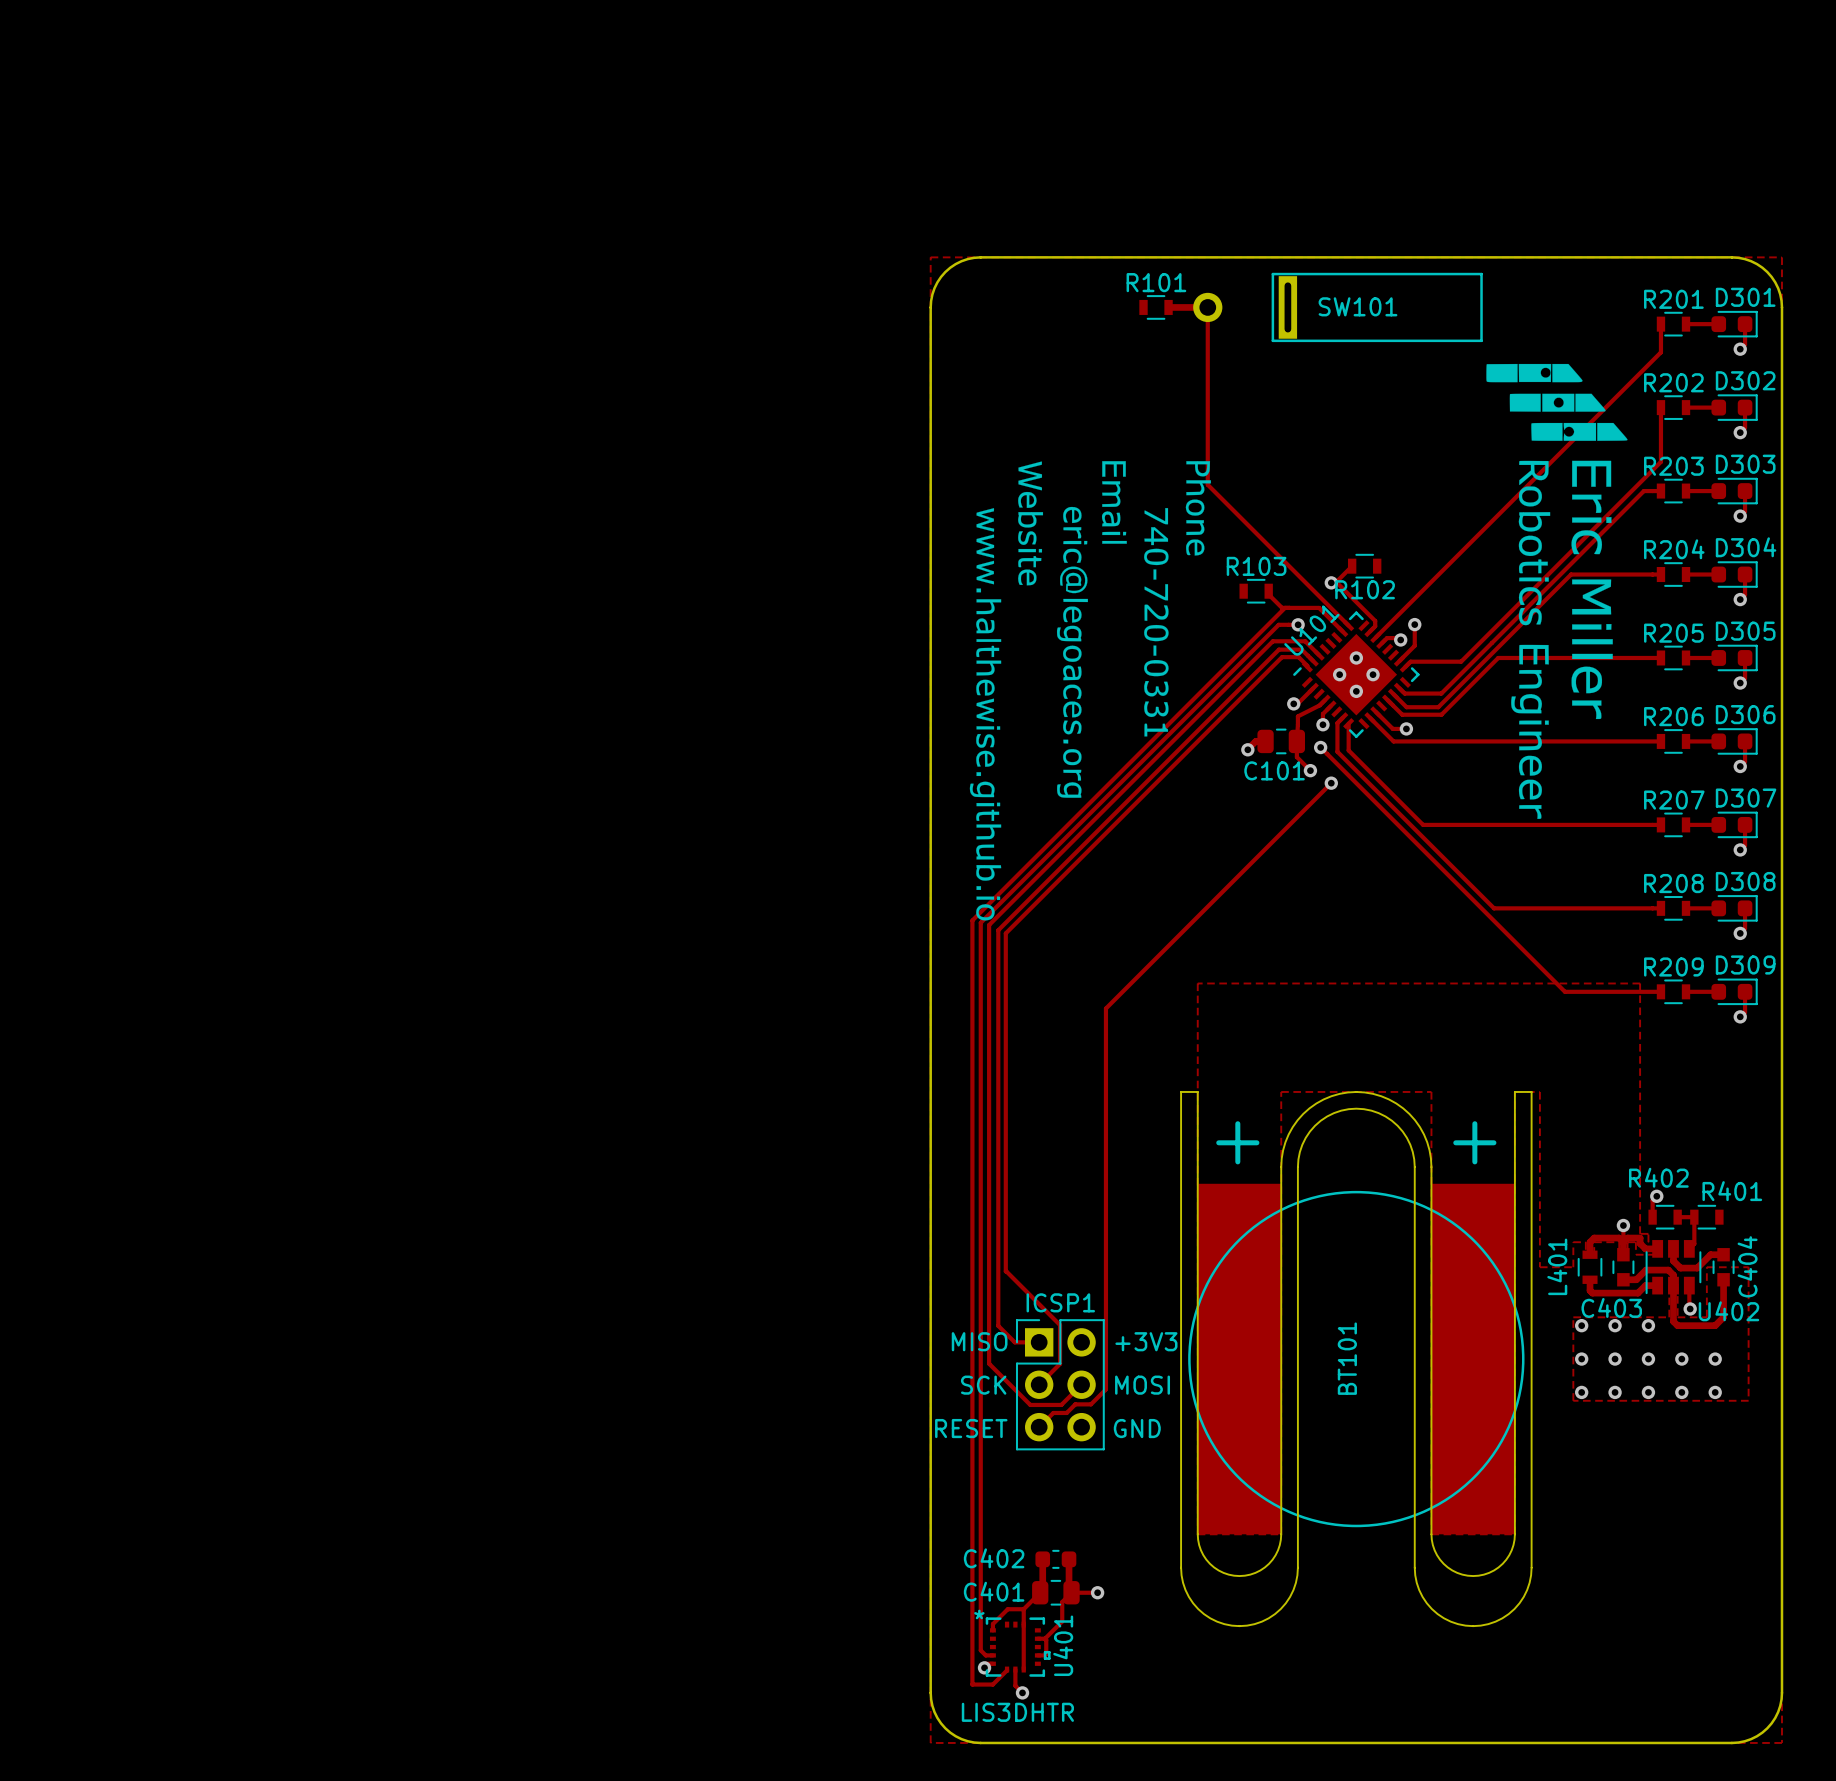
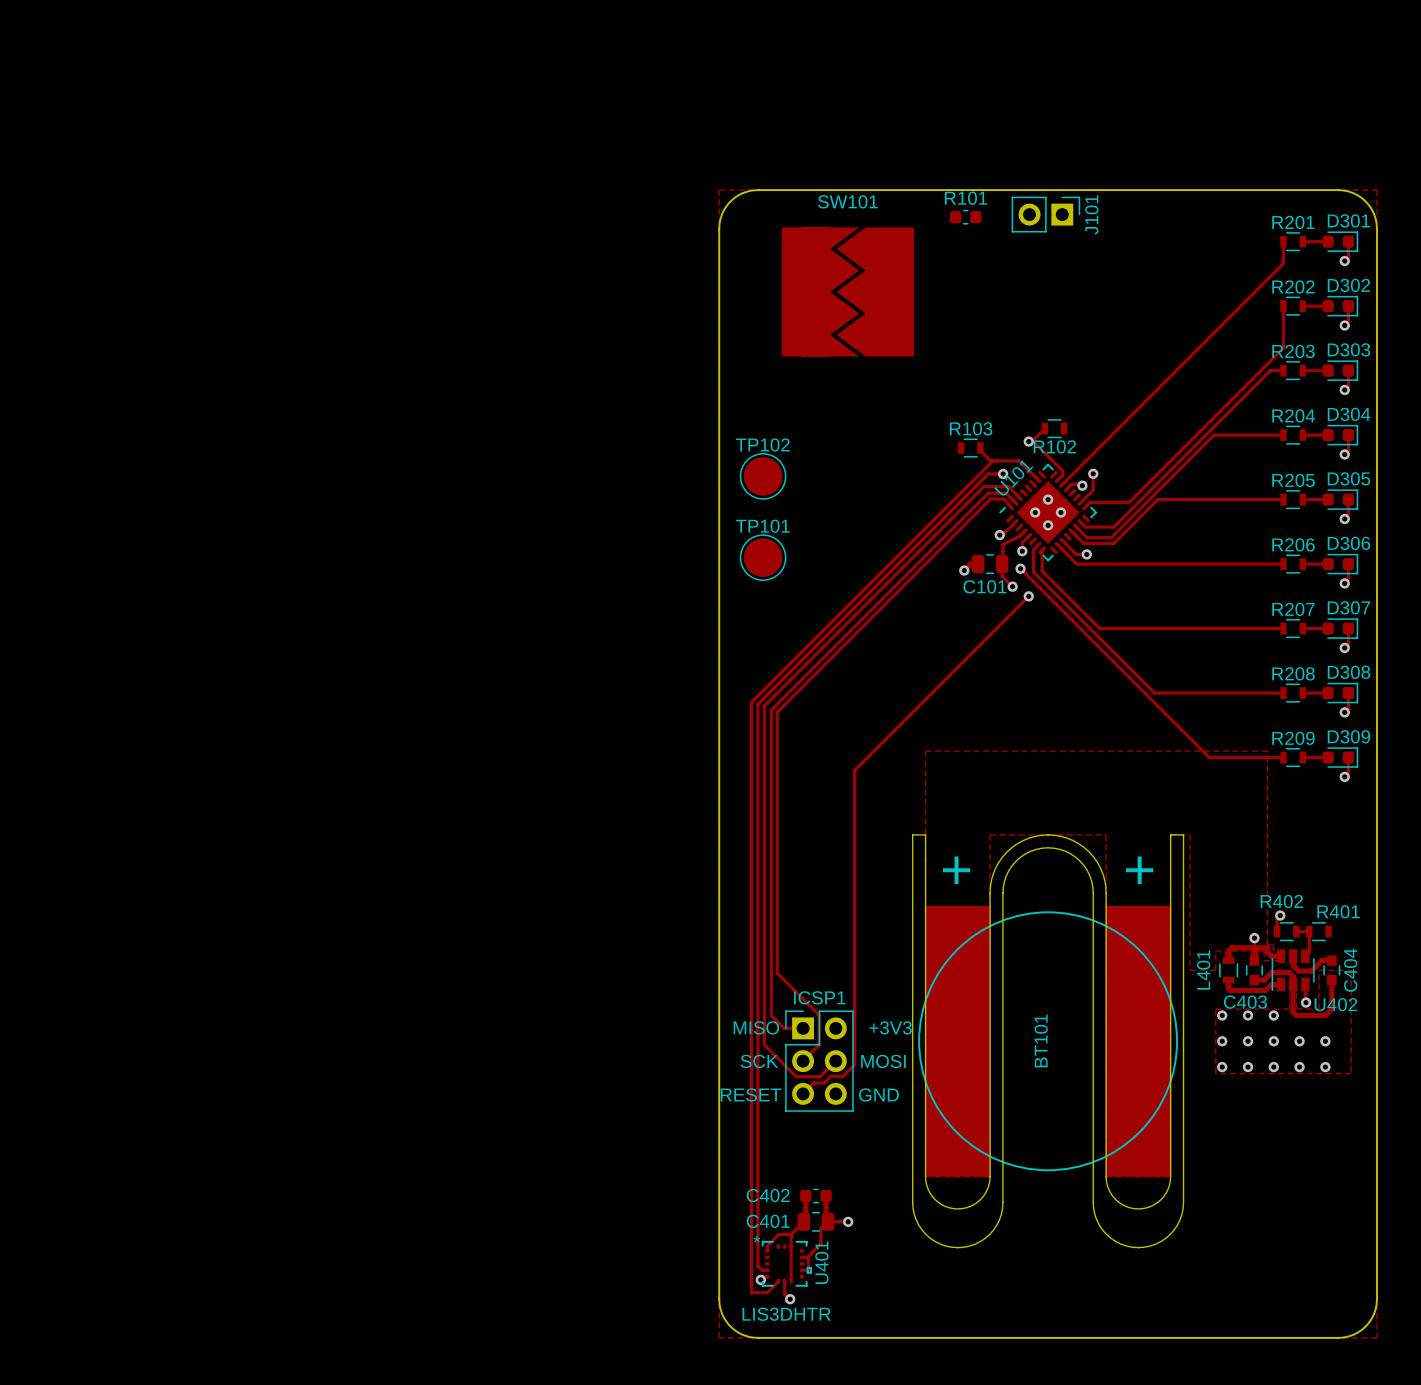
SW101 footprint: [1193, 272, 1483, 343] -> [781, 227, 914, 357]
J101: none -> (1045, 214)
R101 footprint: [1139, 295, 1173, 320] -> [949, 209, 982, 225]
SW101 name position: SW101 (1358, 306) -> SW101 (847, 201)
track: (1168, 307) (1207, 307) (1207, 484) (1348, 625) -> none
drawing: [969, 363, 1628, 921] -> none
TP102: none -> (763, 476)
TP101: none -> (763, 557)

